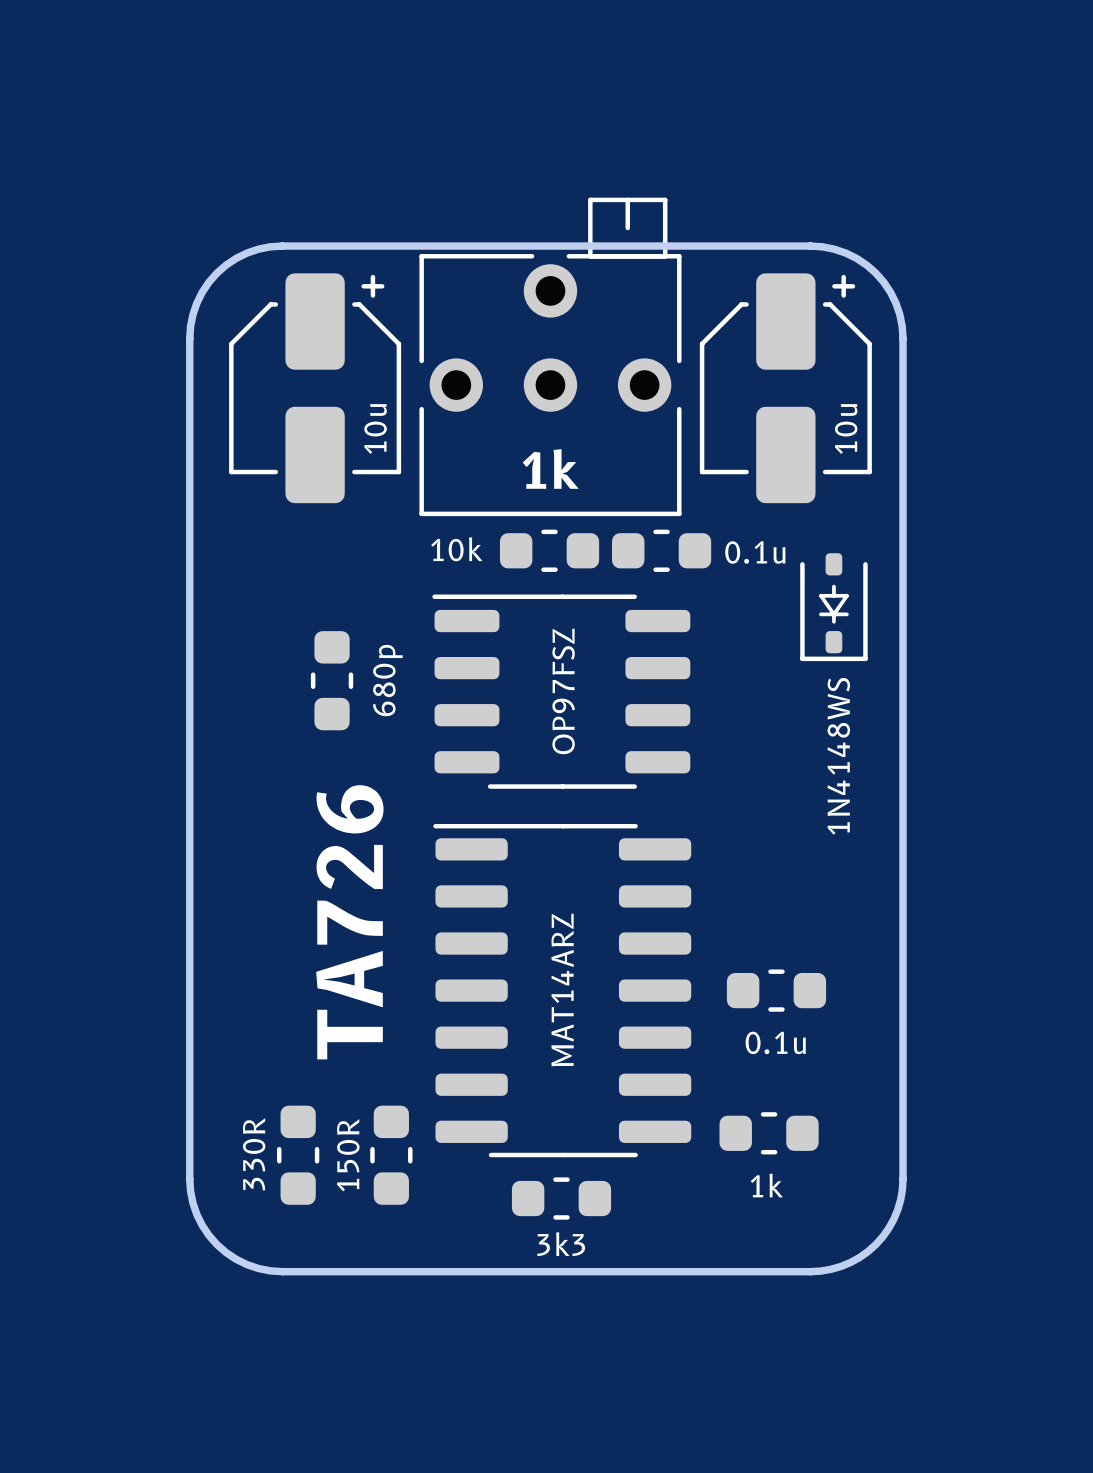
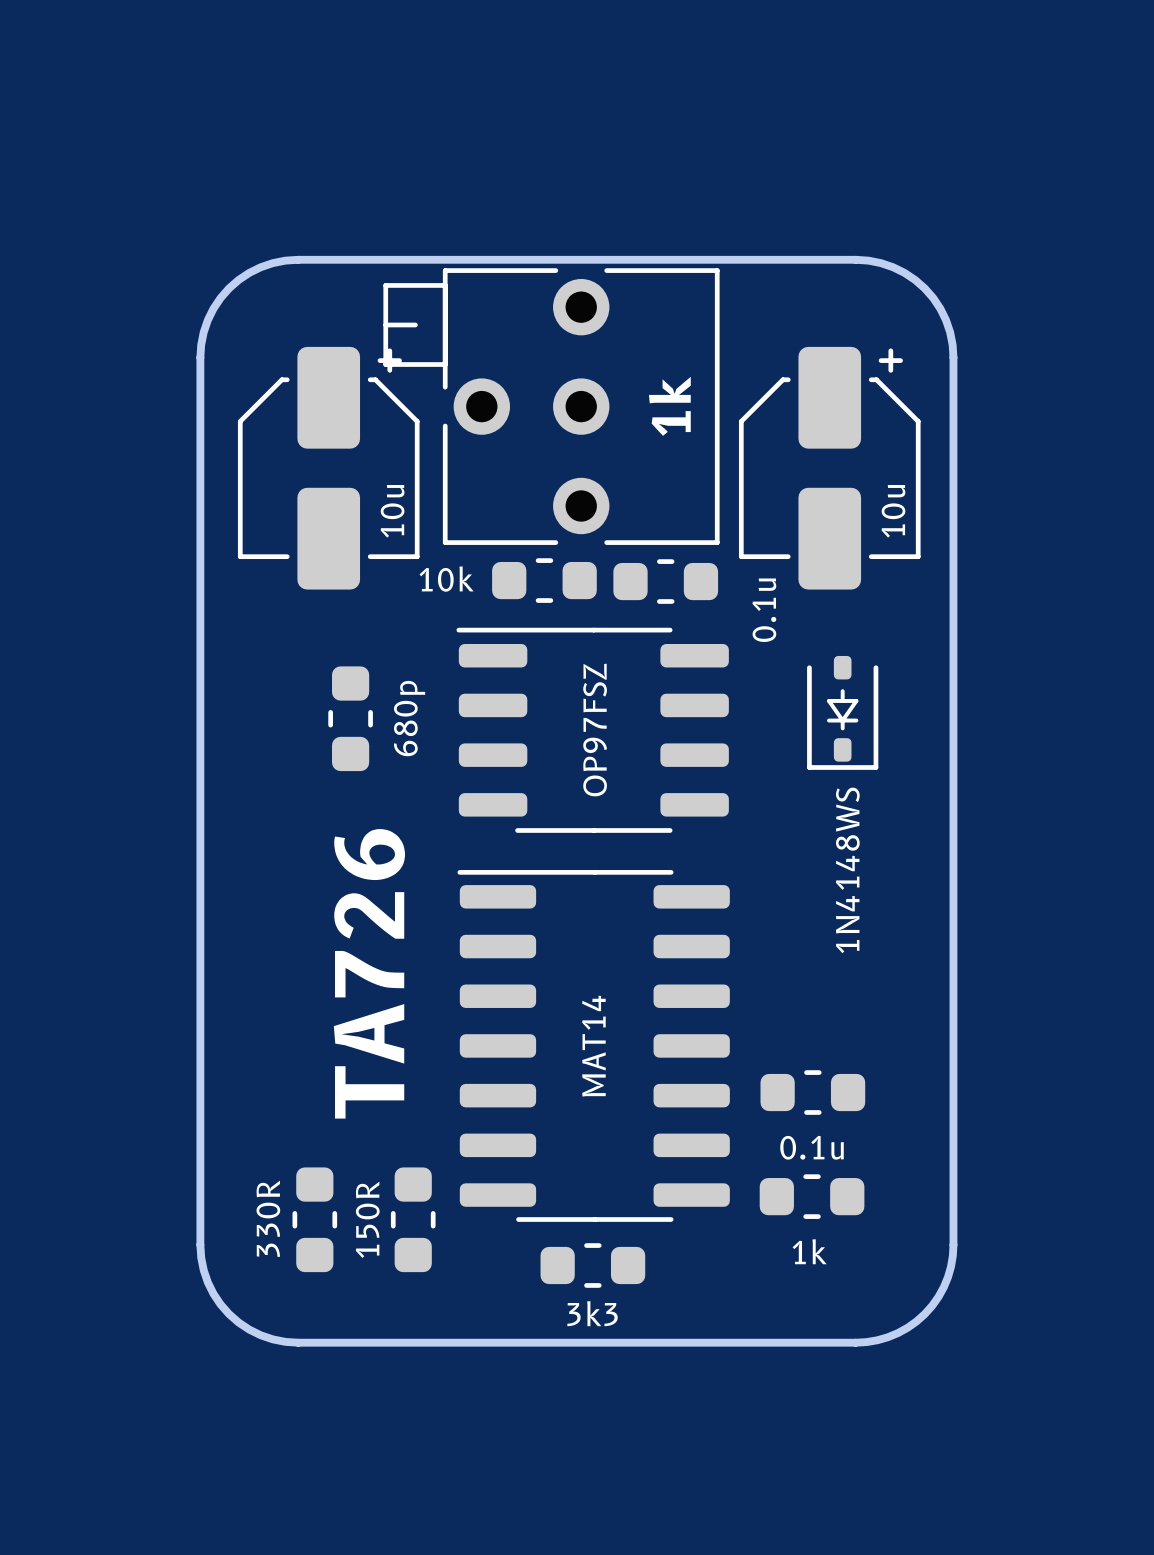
part rotation: 0° (550, 356) -> 90° counterclockwise (551, 406)
part position: (315, 388) -> (328, 468)
part position: (785, 388) -> (829, 468)
part position: (549, 550) -> (544, 580)
part position: (661, 550) -> (665, 581)
part value rotation: 0° (755, 552) -> 90° counterclockwise (764, 610)
part position: (833, 607) -> (842, 712)
part value: MAT14ARZ (562, 989) -> MAT14 (593, 1046)
part position: (776, 990) -> (812, 1092)

